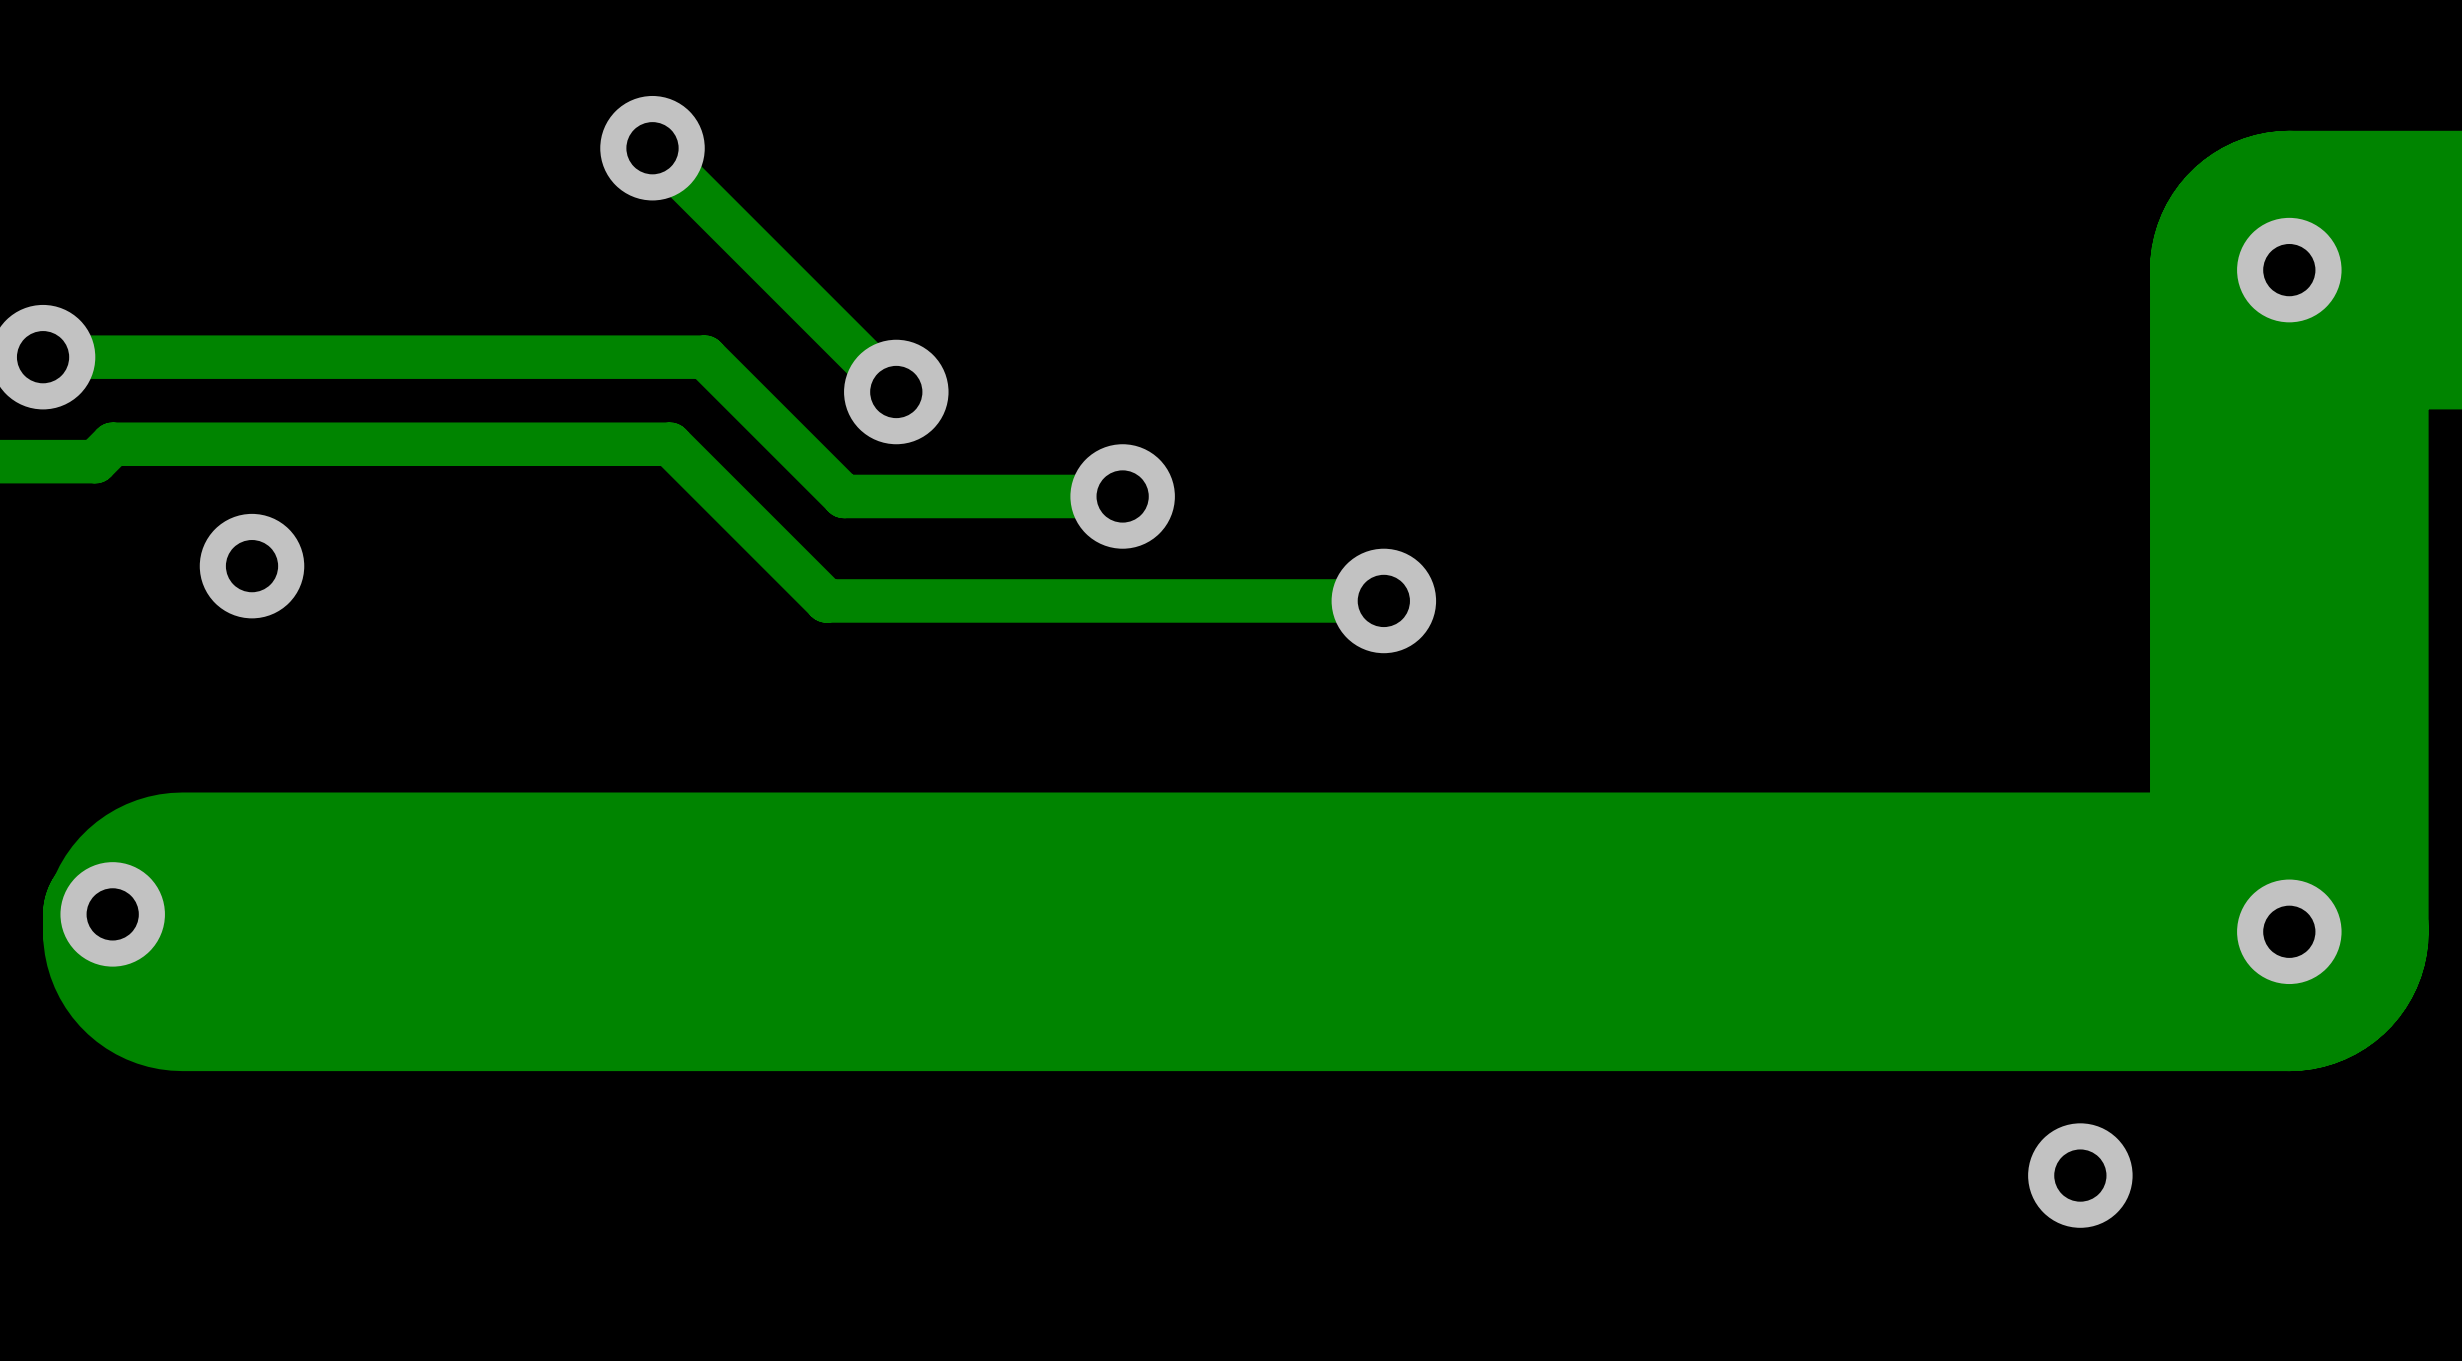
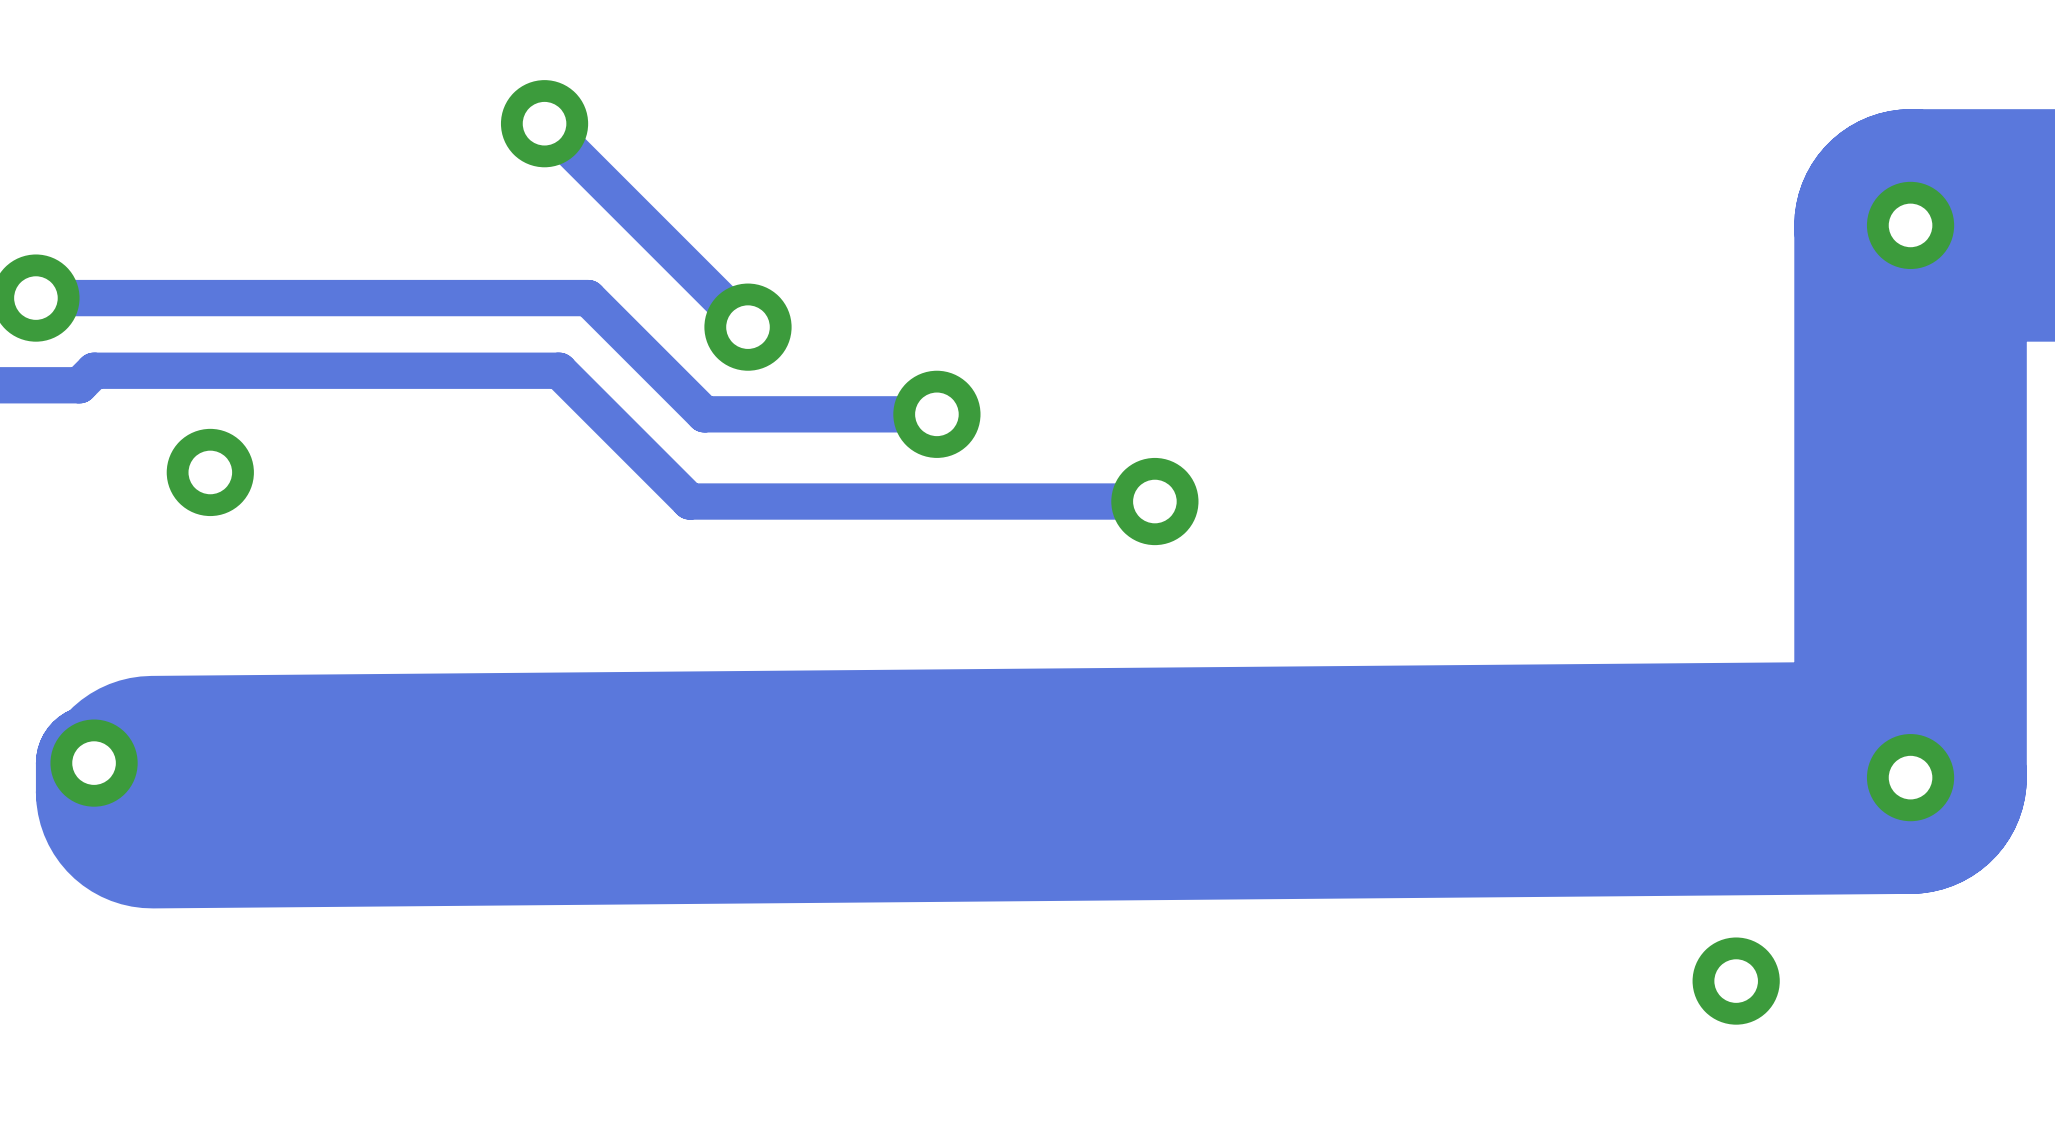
track: (2289, 931) (112, 931) -> (1910, 777) (152, 792) (94, 792) (94, 777)

